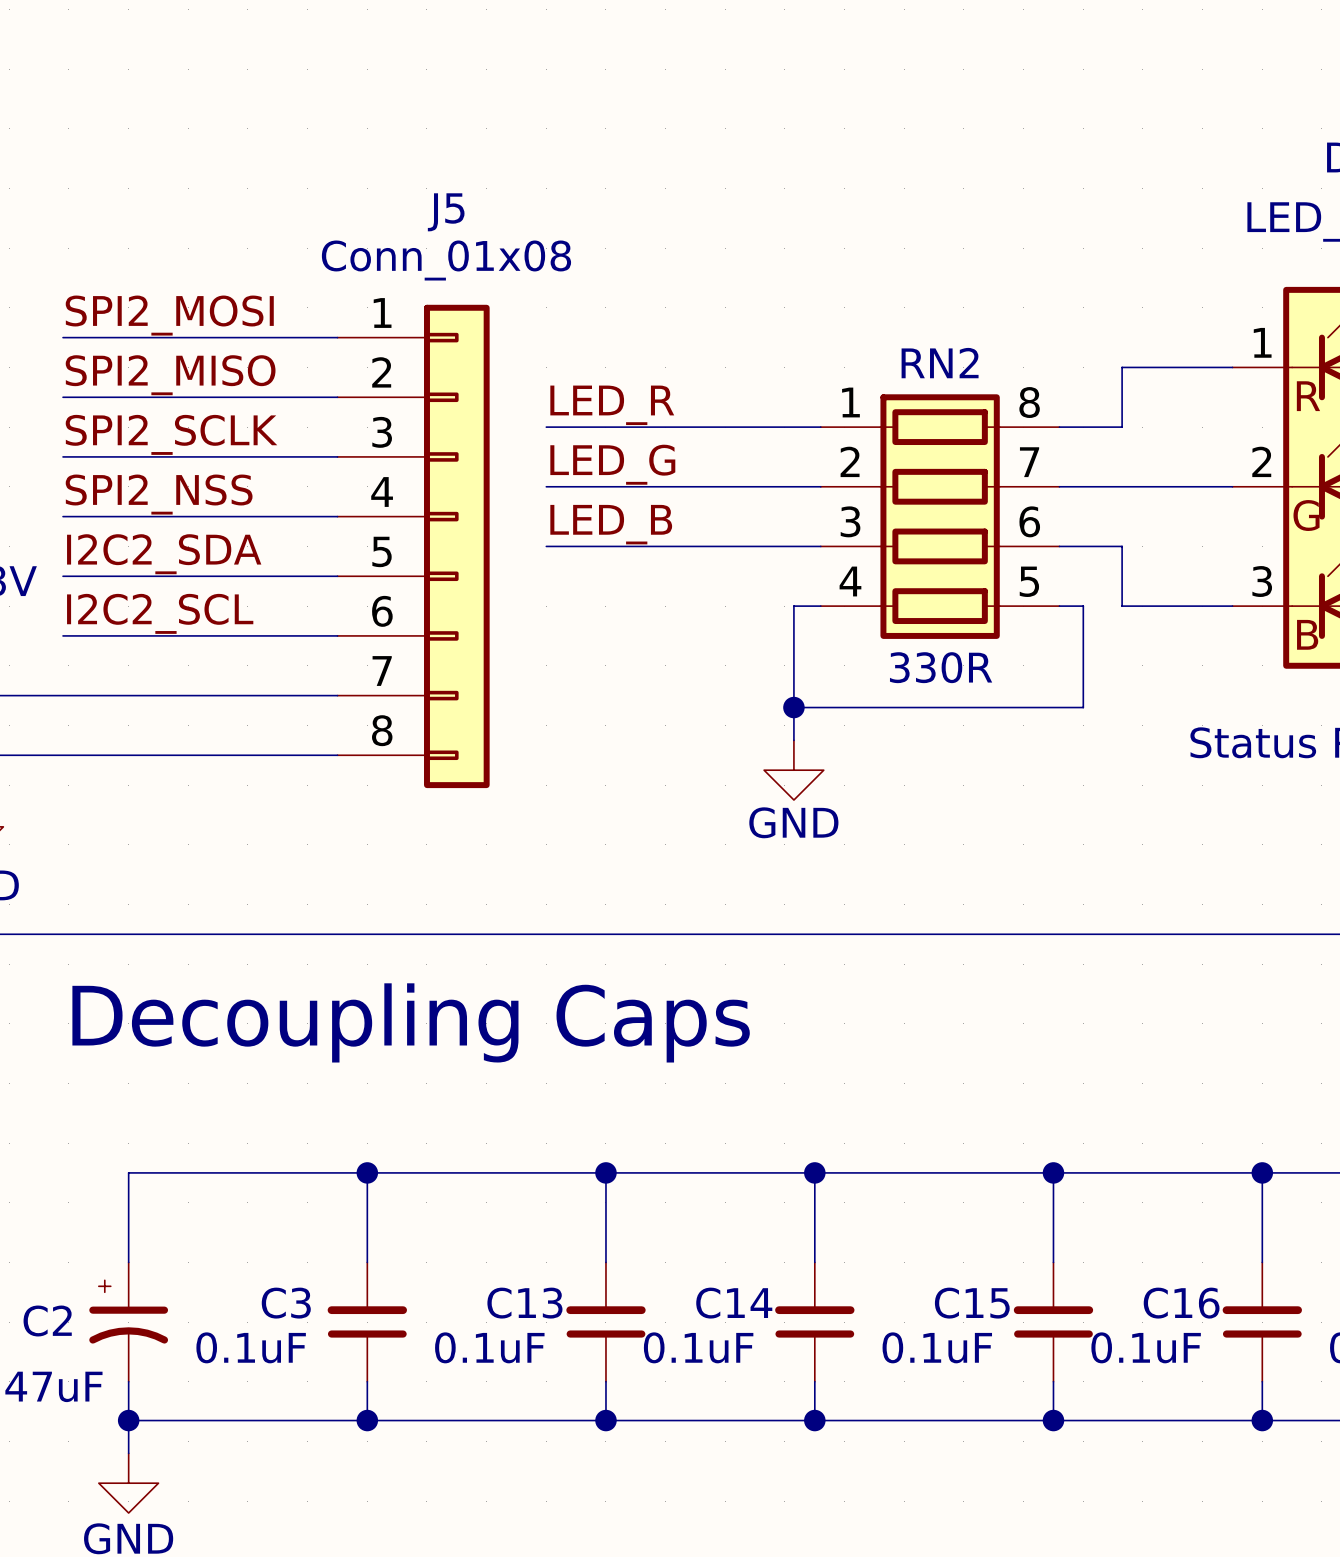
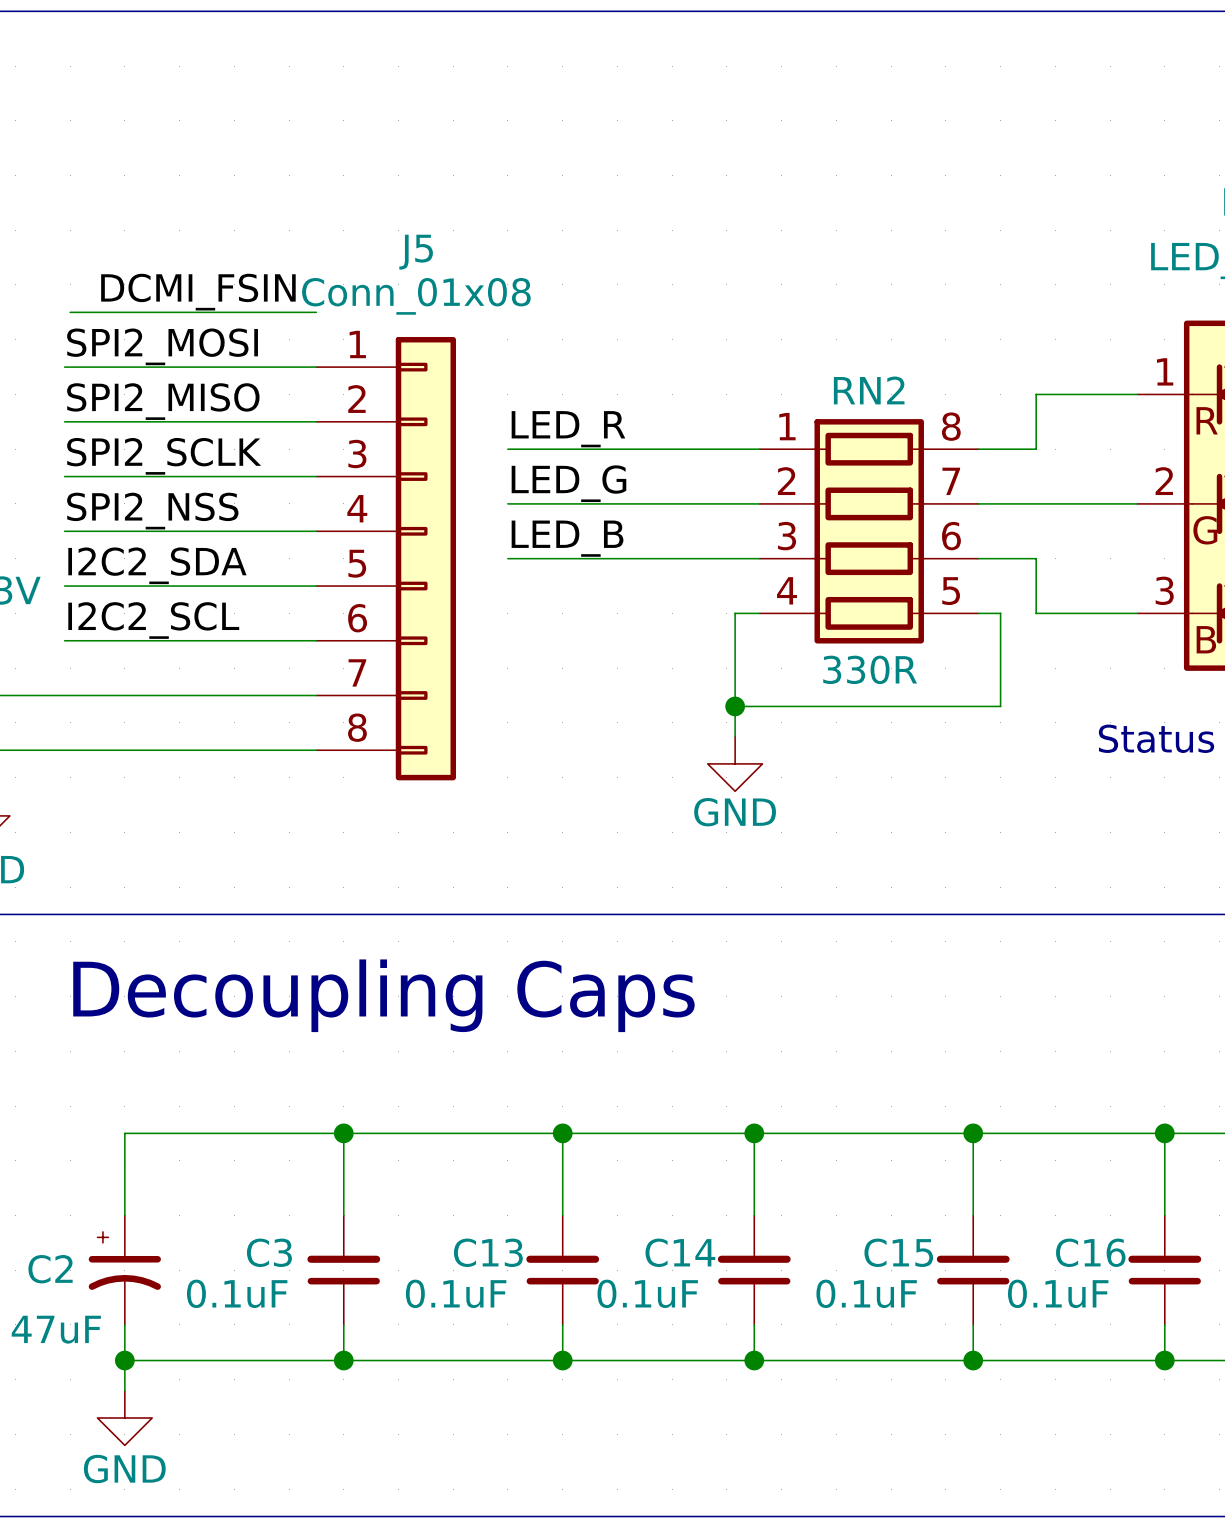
label: none -> DCMI_FSIN (198, 292)
wire: none -> (70, 312) (316, 312)

